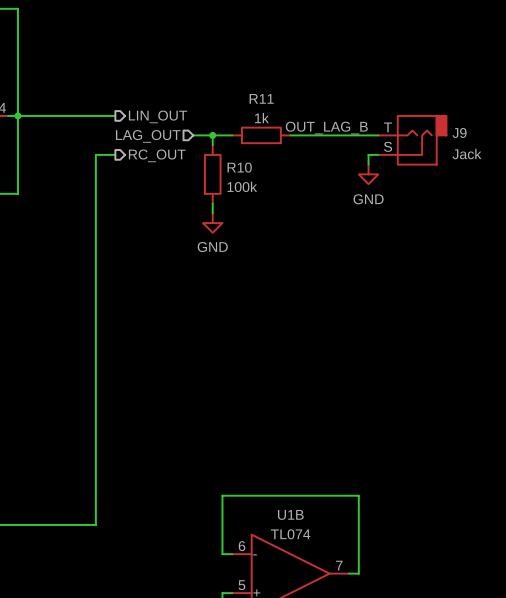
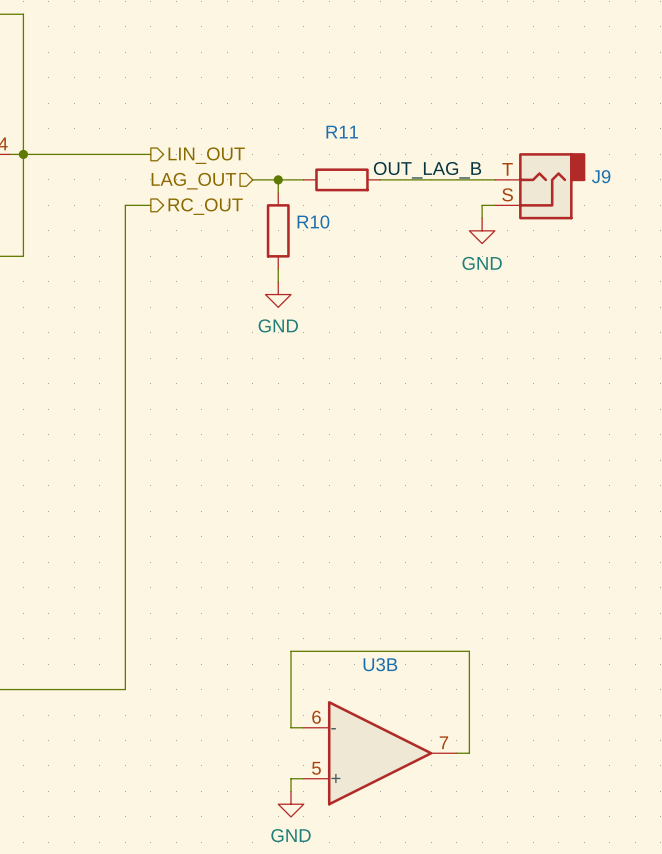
R11 value: 1k (261, 118) -> none
J9 value: Jack (466, 154) -> none
R10 value: 100k (242, 186) -> none
U1B name: U1B (290, 514) -> U3B (380, 664)
U1B value: TL074 (290, 534) -> none

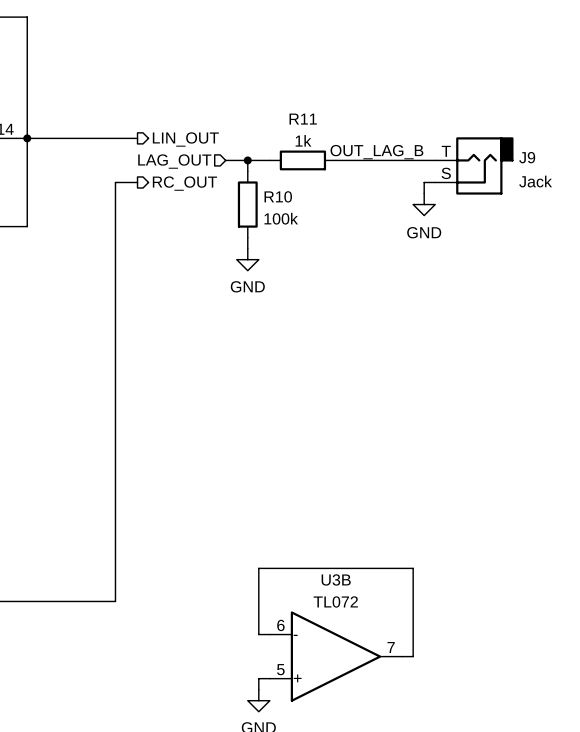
R11 value: none -> 1k (303, 140)
J9 value: none -> Jack (535, 181)
R10 value: none -> 100k (281, 218)
U3B value: none -> TL072 (335, 601)

